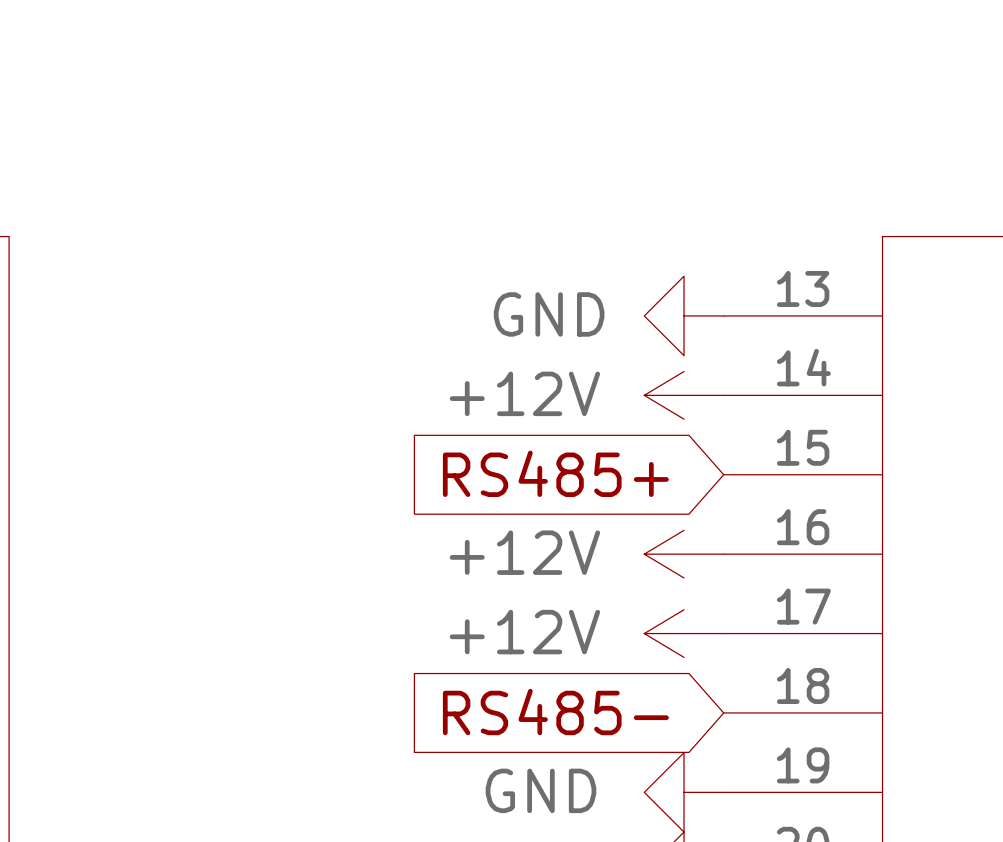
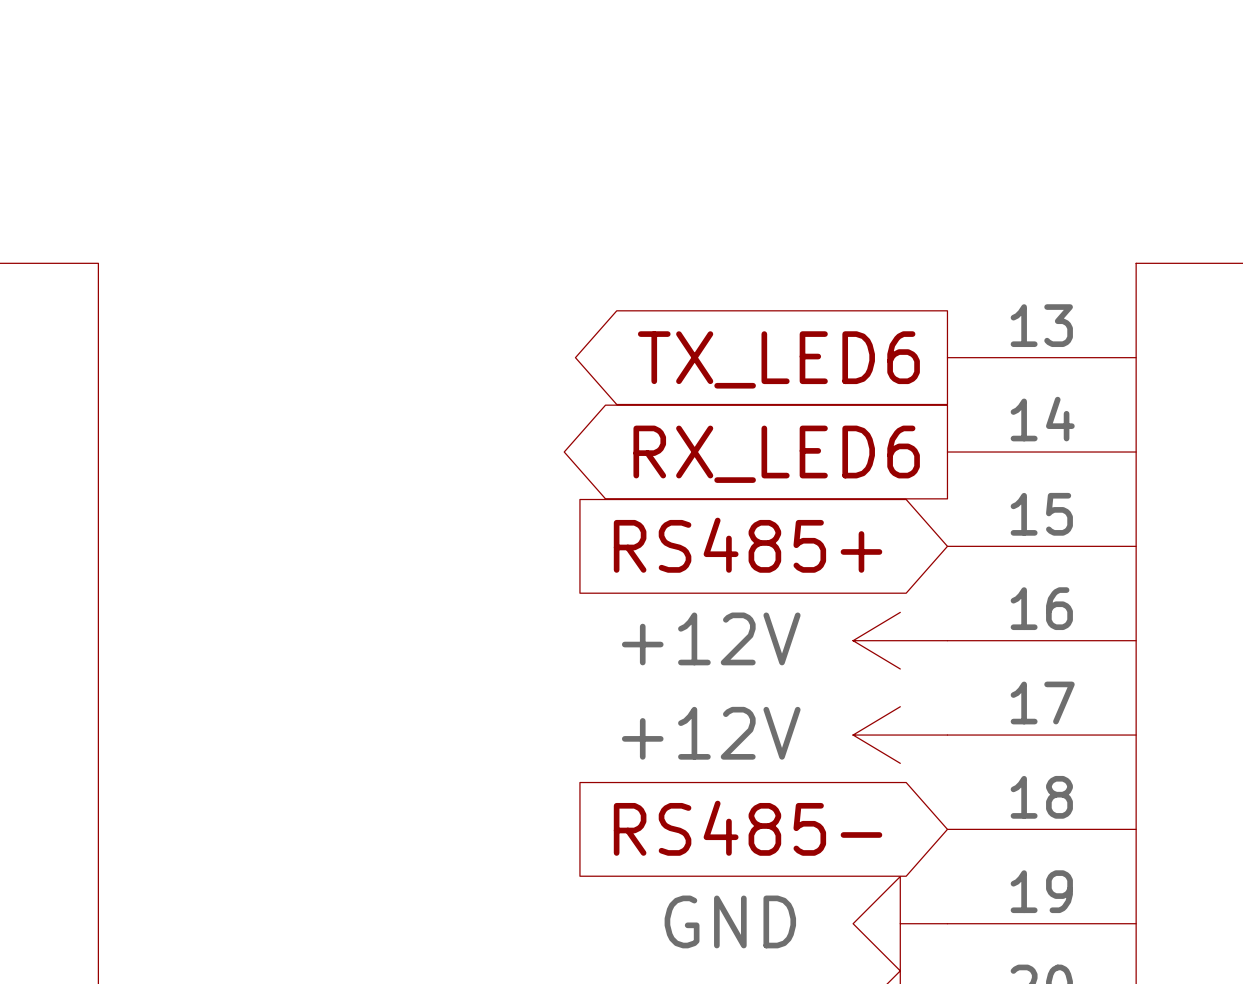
power symbol: GND (684, 315) -> none
global label: none -> TX_LED6 (778, 359)
power symbol: +12V (684, 395) -> none
global label: none -> RX_LED6 (776, 454)

